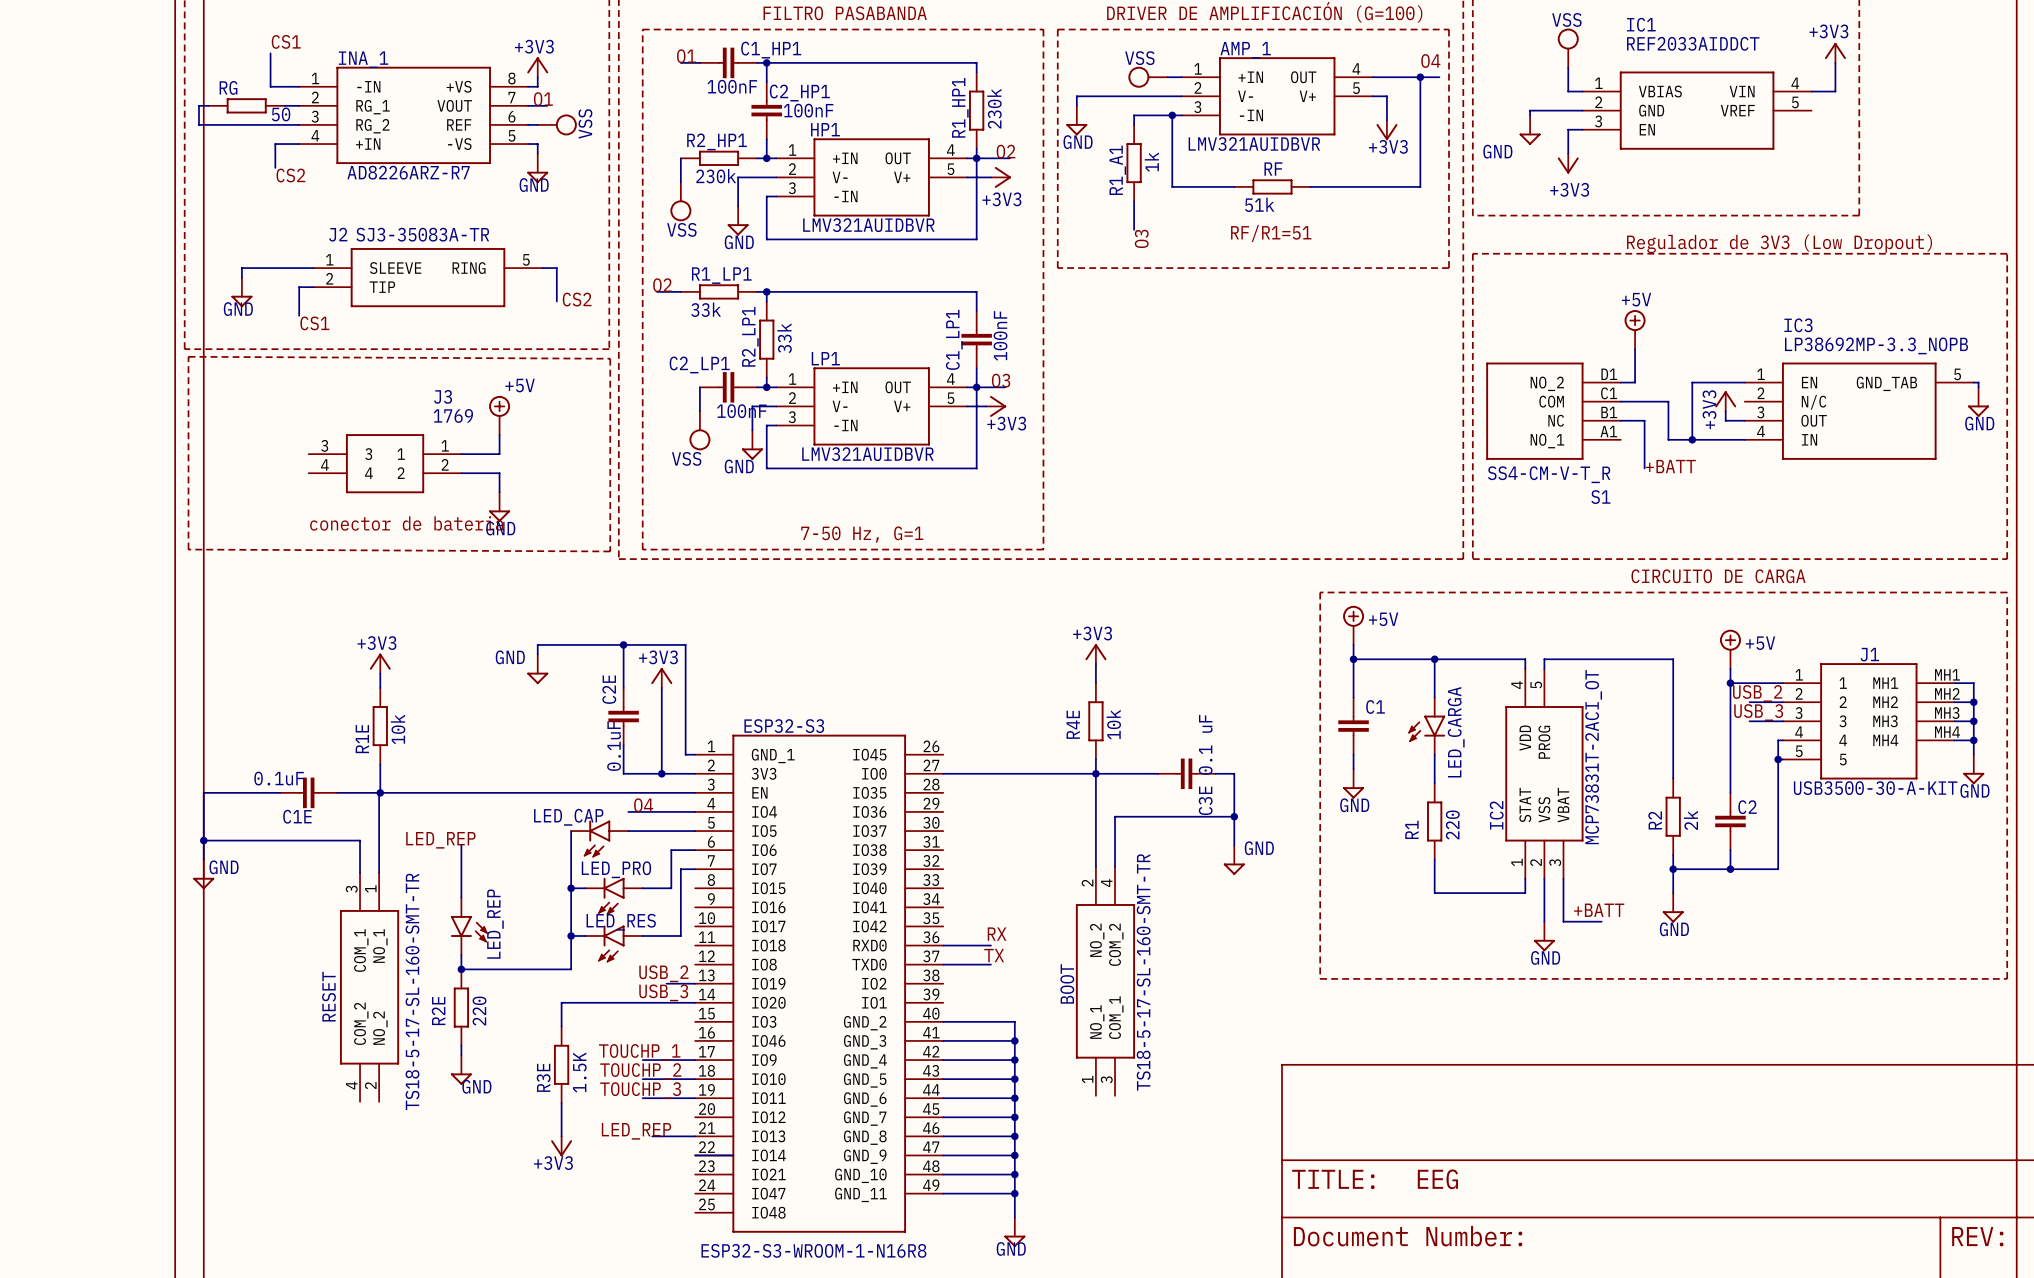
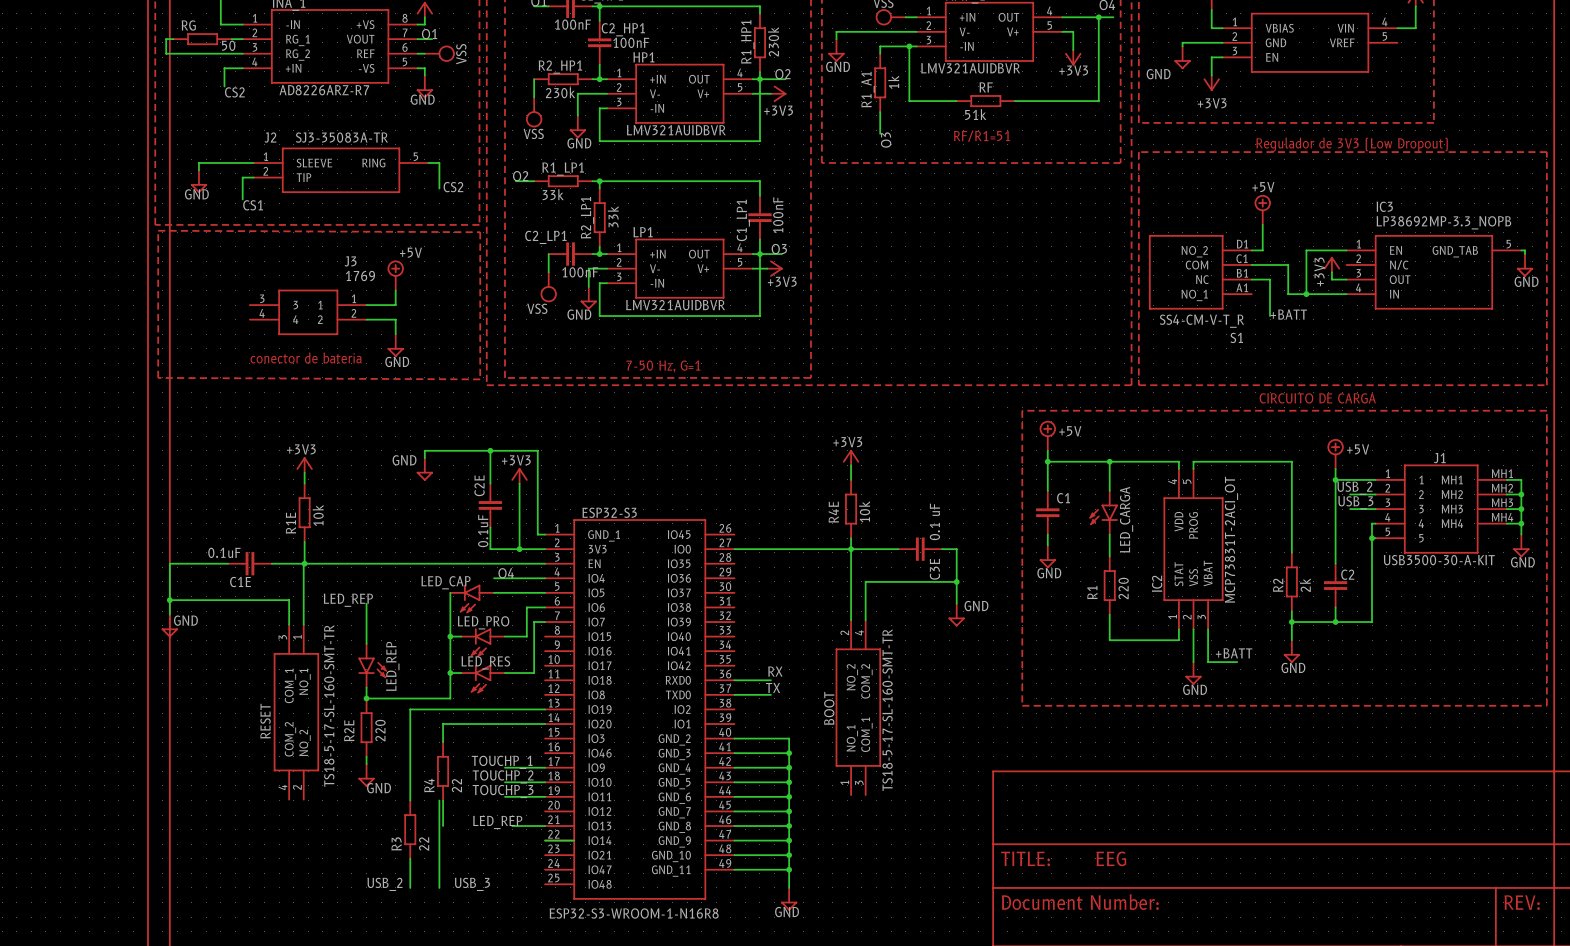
label: USB_2 (663, 973) -> none
wire: none -> (523, 709) (410, 709) (410, 800)
label: USB_3 (663, 992) -> none
R3E value: 1.5K (579, 1072) -> 22 (456, 785)
R3E name: R3E (543, 1077) -> R4 (429, 785)
wire: none -> (439, 800) (439, 887)
R3: none -> 22 (410, 829)
power symbol: +3V3 (561, 1146) -> none
wire: none -> (410, 858) (410, 887)
label: none -> USB_2 (384, 884)
label: none -> USB_3 (472, 884)

